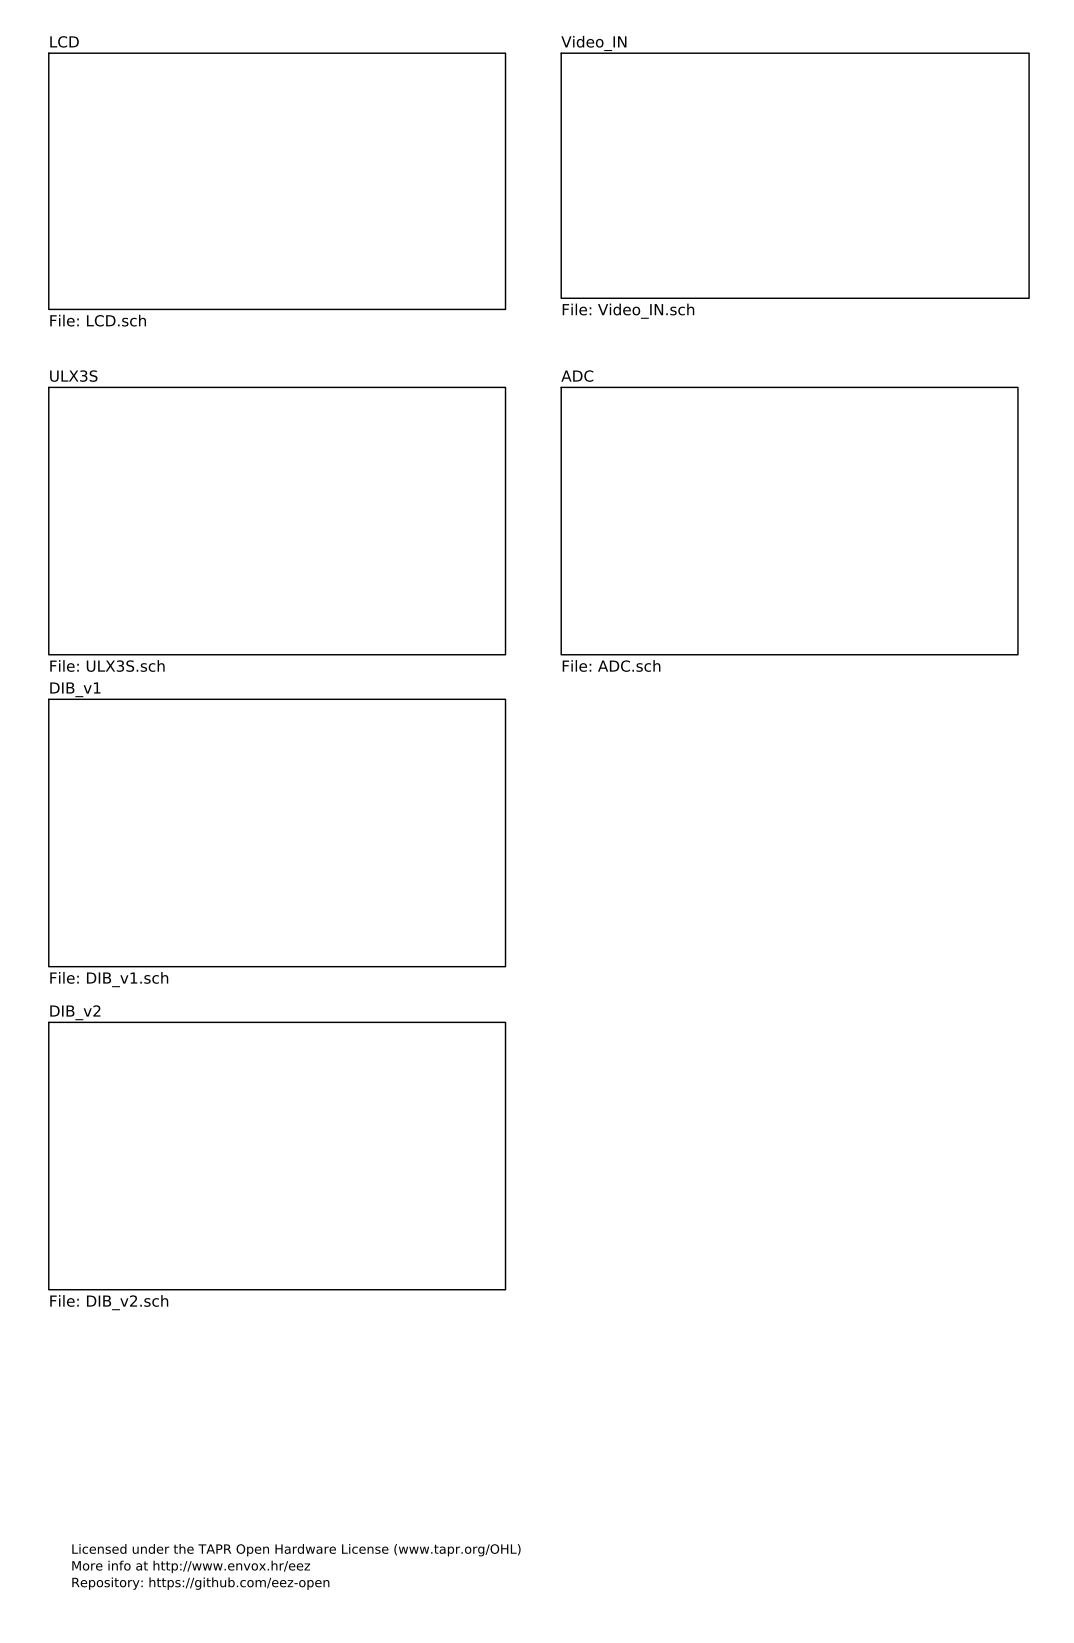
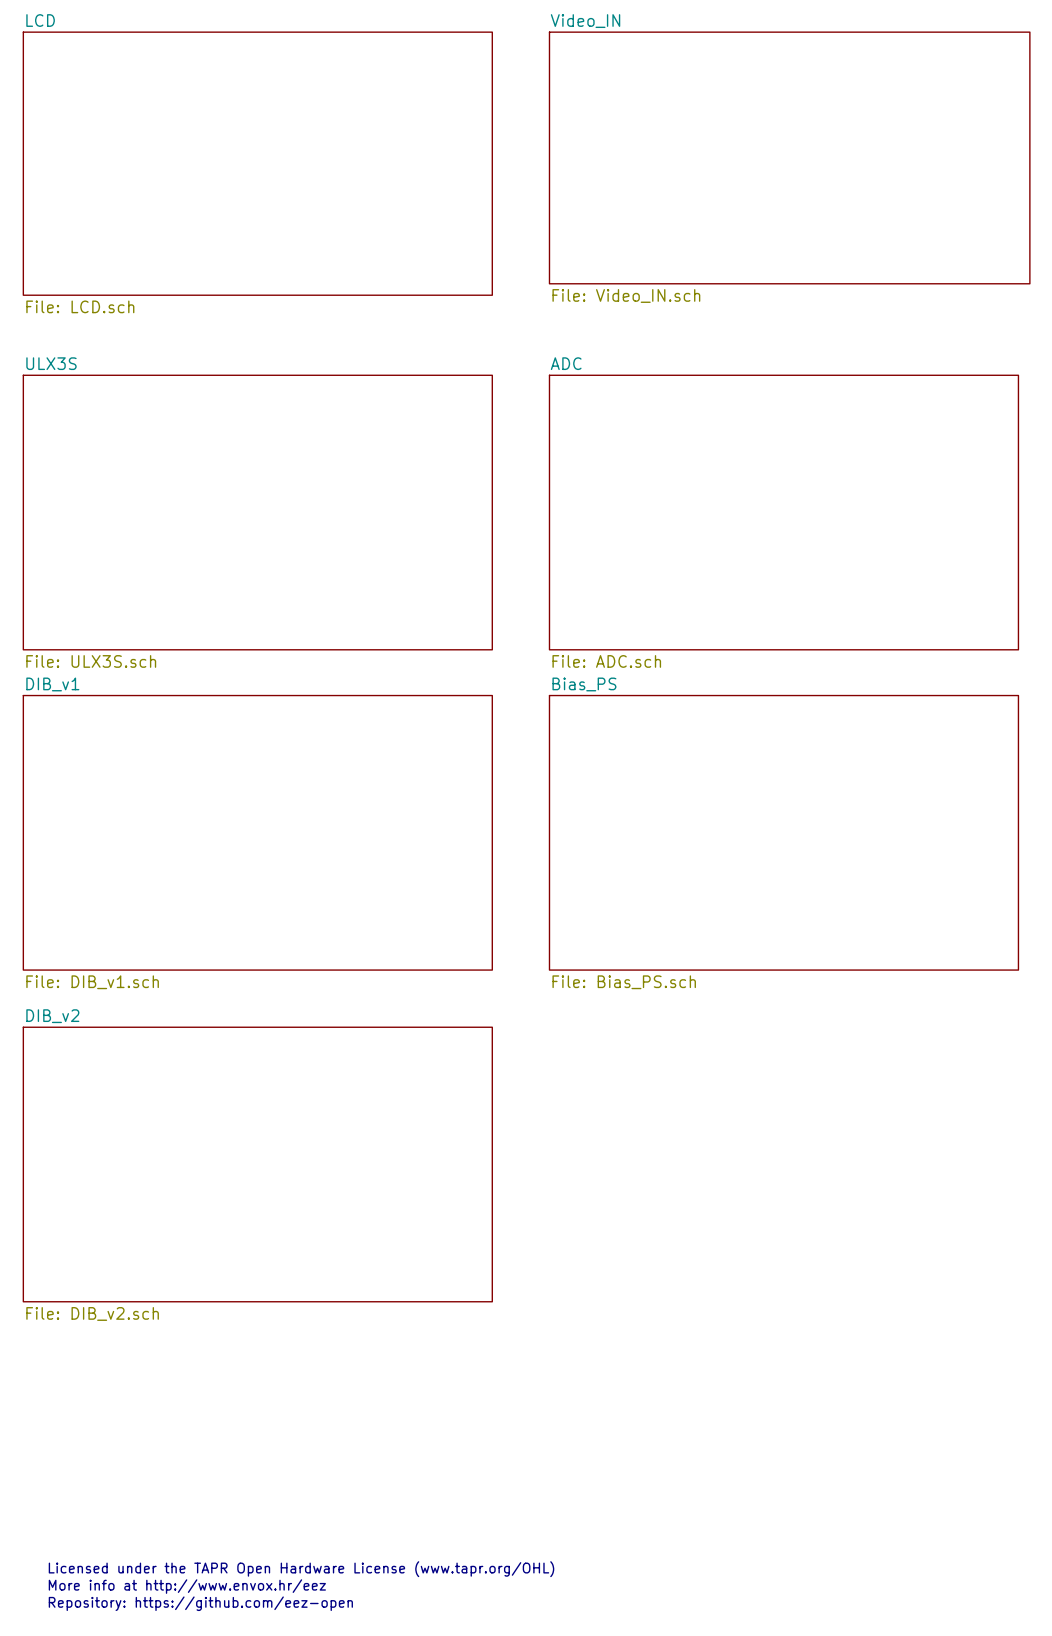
sheet Bias_PS: none -> File: Bias_PS.sch (783, 832)

